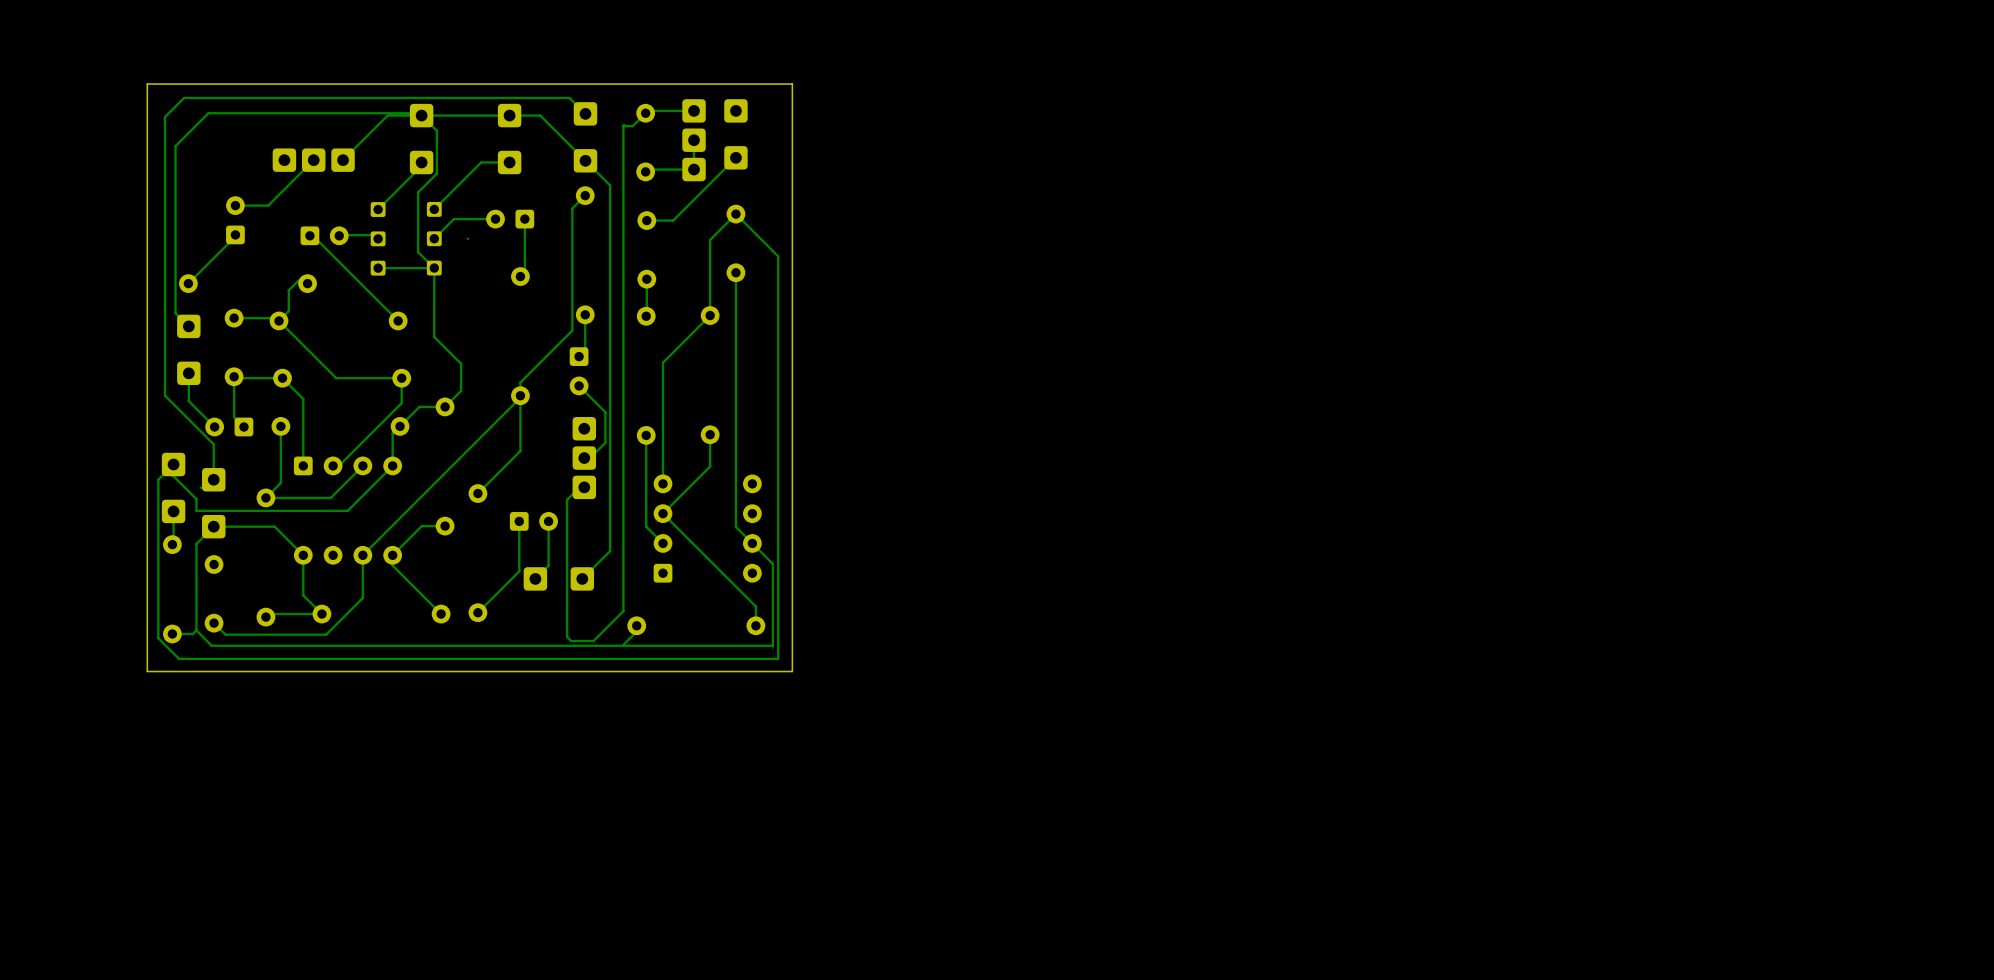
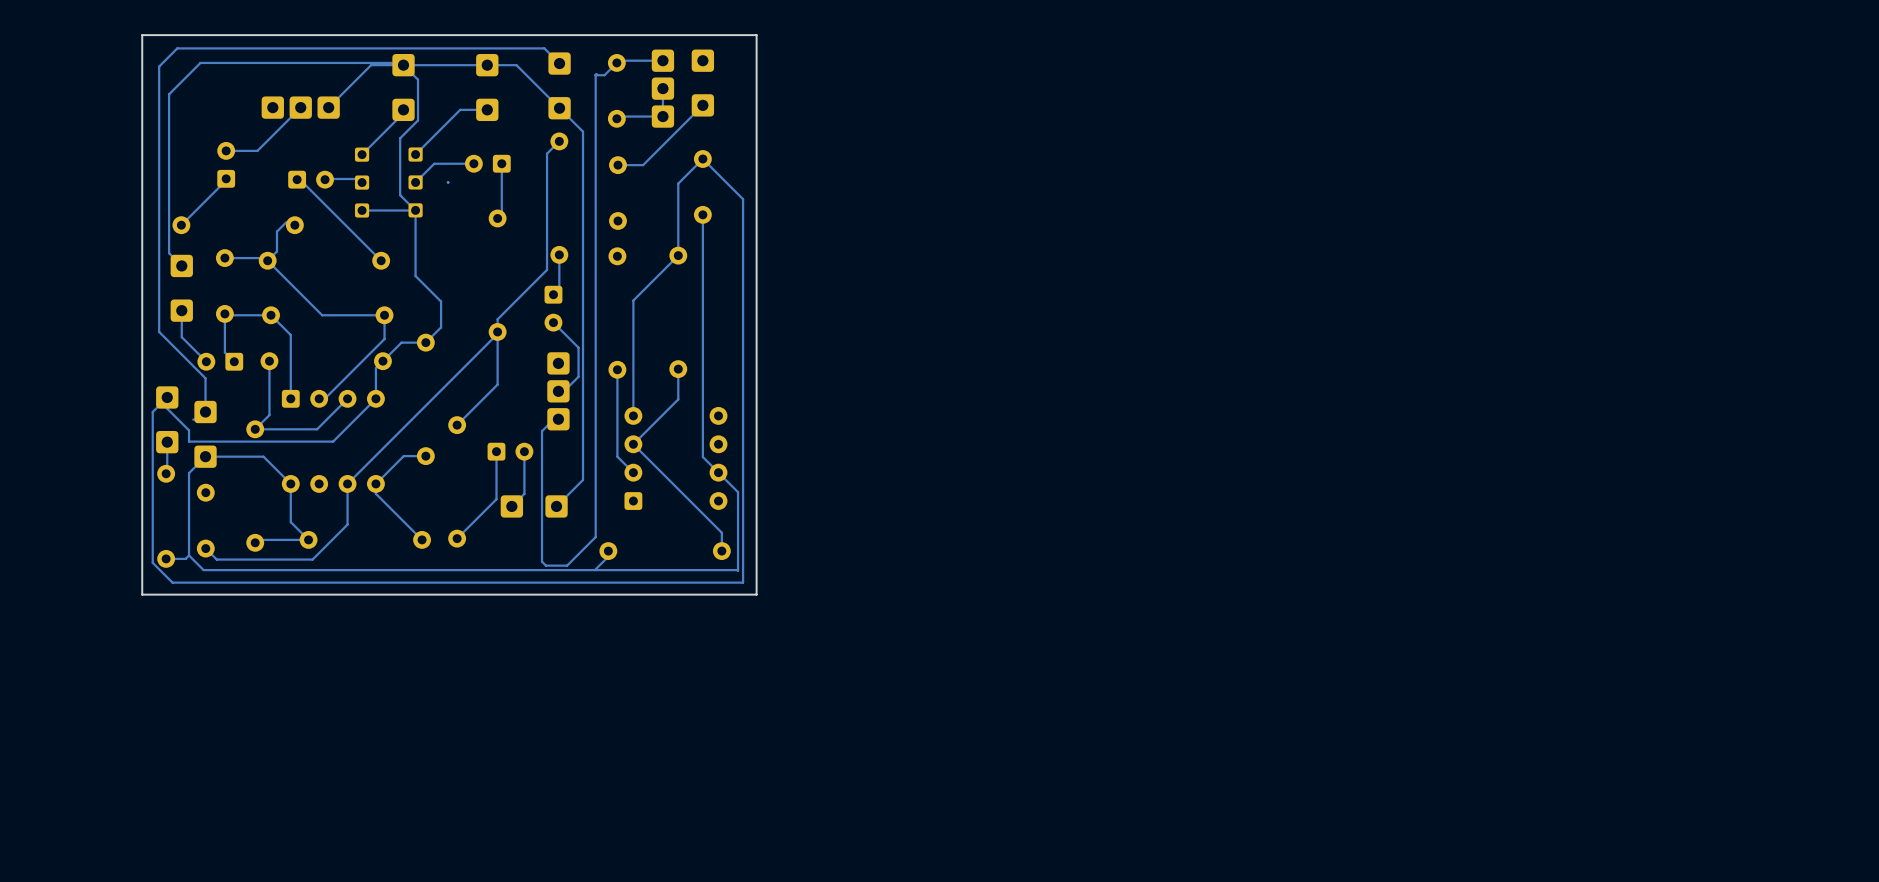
track: (646, 279) (646, 316) -> none

